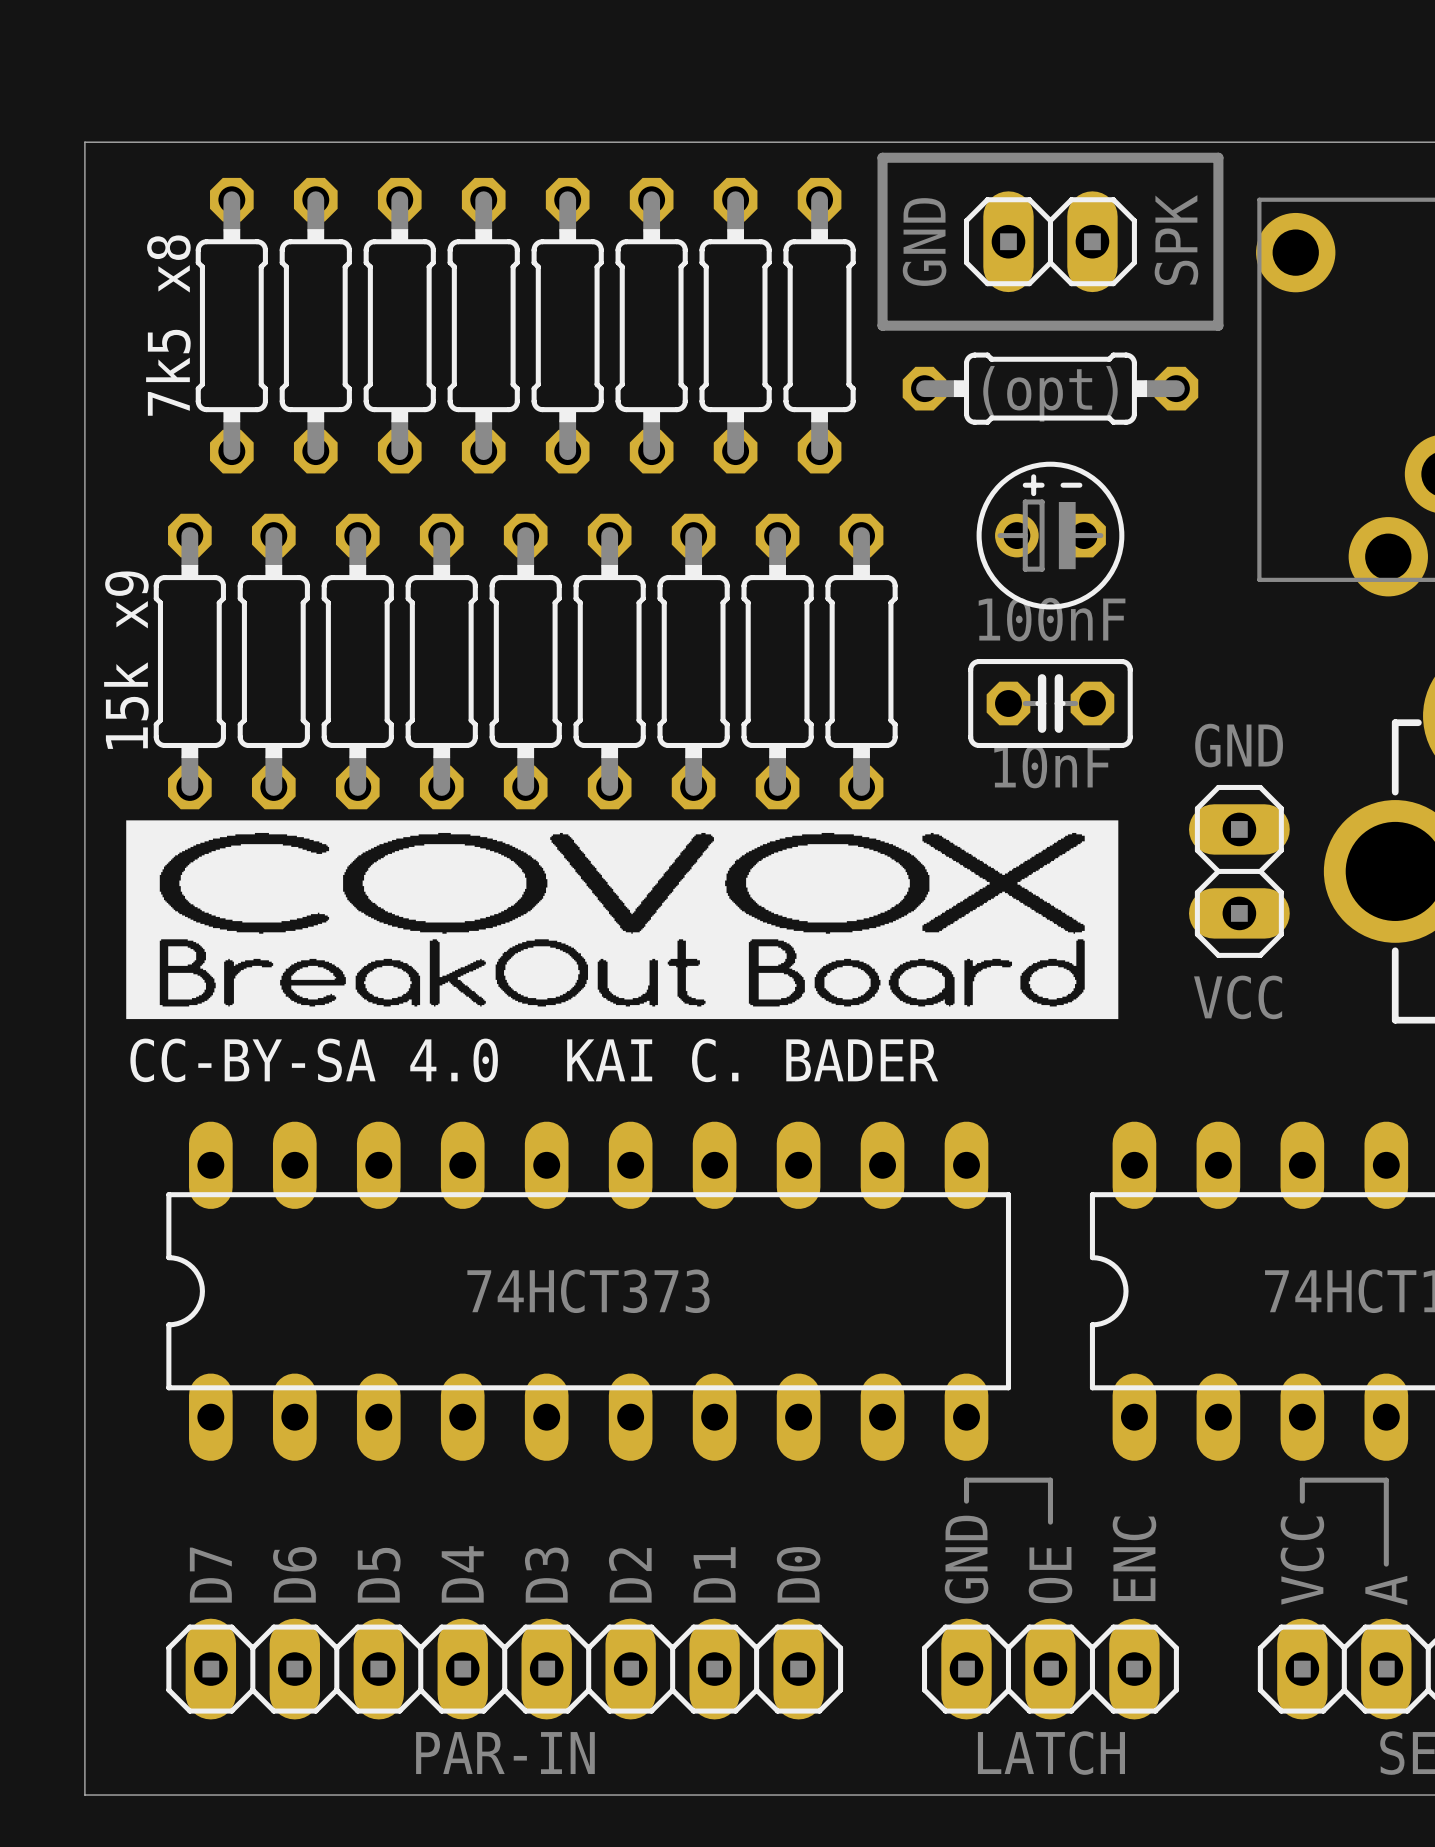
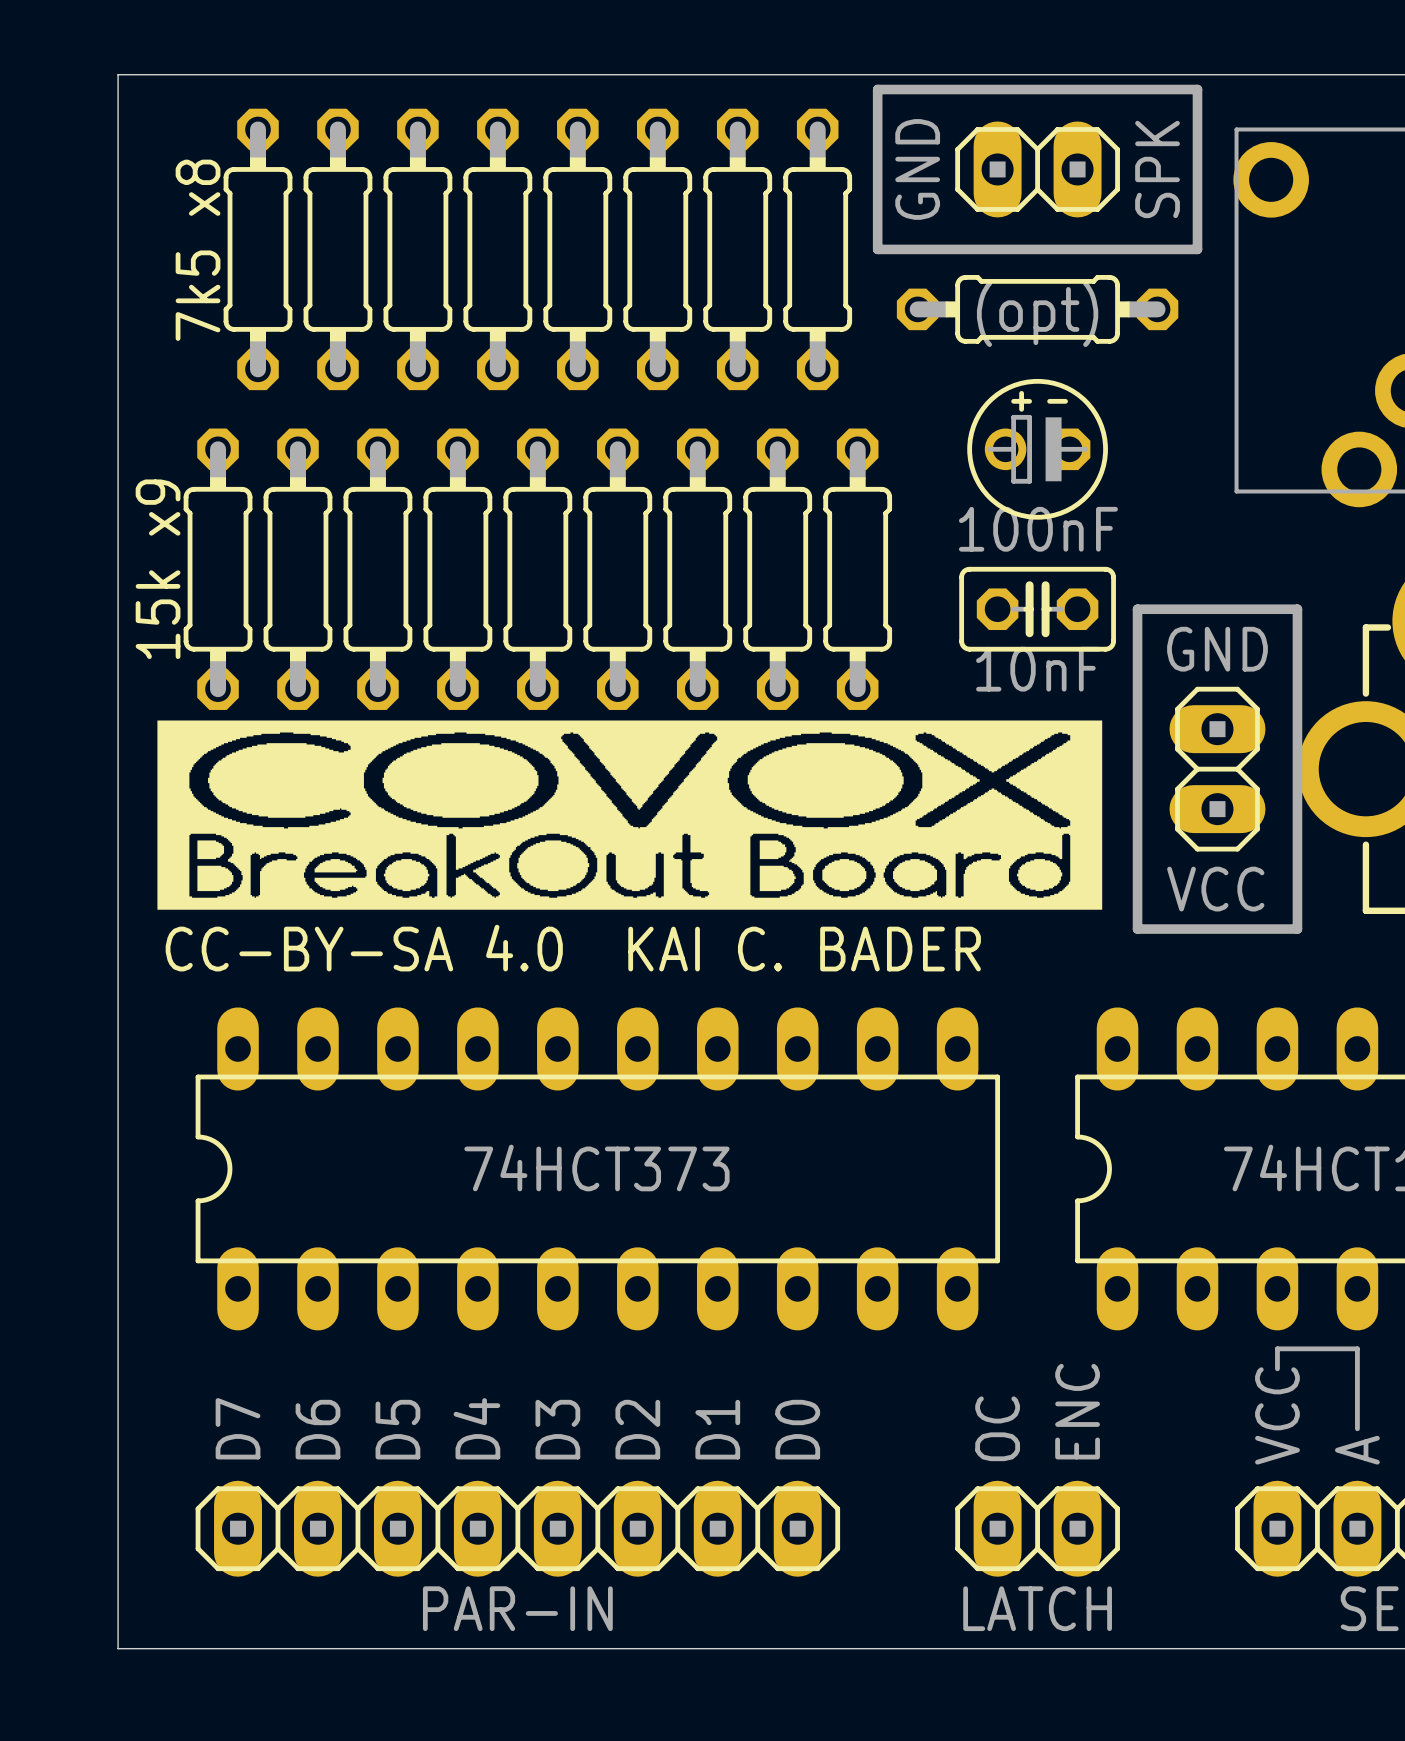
line: none -> (1137, 609) (1297, 609) (1297, 929) (1137, 929) (1137, 609)
line: (966, 1501) (966, 1480) (1050, 1480) (1050, 1522) -> none
text position: ENC (1134, 1558) -> ENC (1077, 1411)
text: GND (966, 1559) -> none
text: none -> OC (997, 1428)
text: OE (1050, 1575) -> none
part footprint: [922, 1618, 1179, 1720] -> [955, 1480, 1120, 1577]

